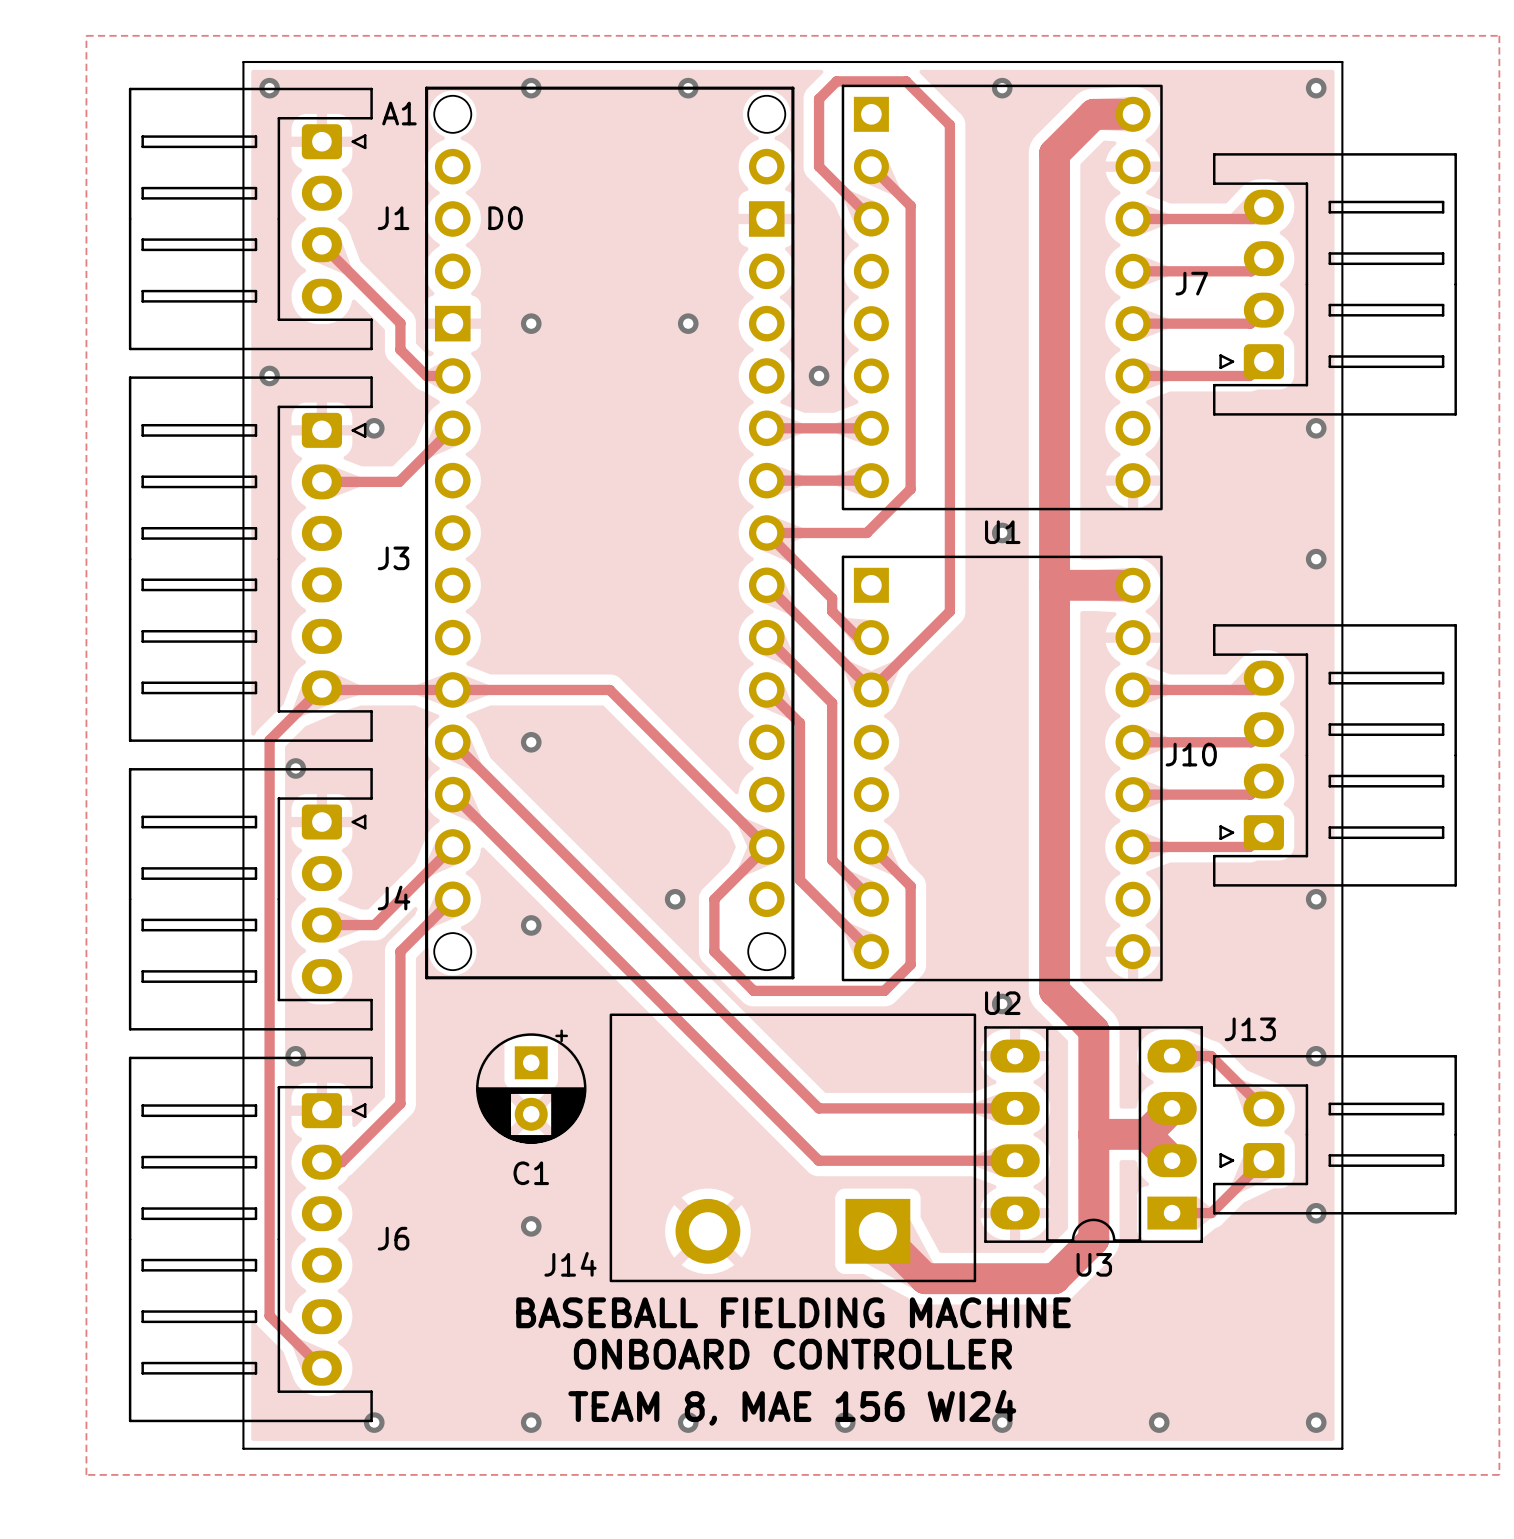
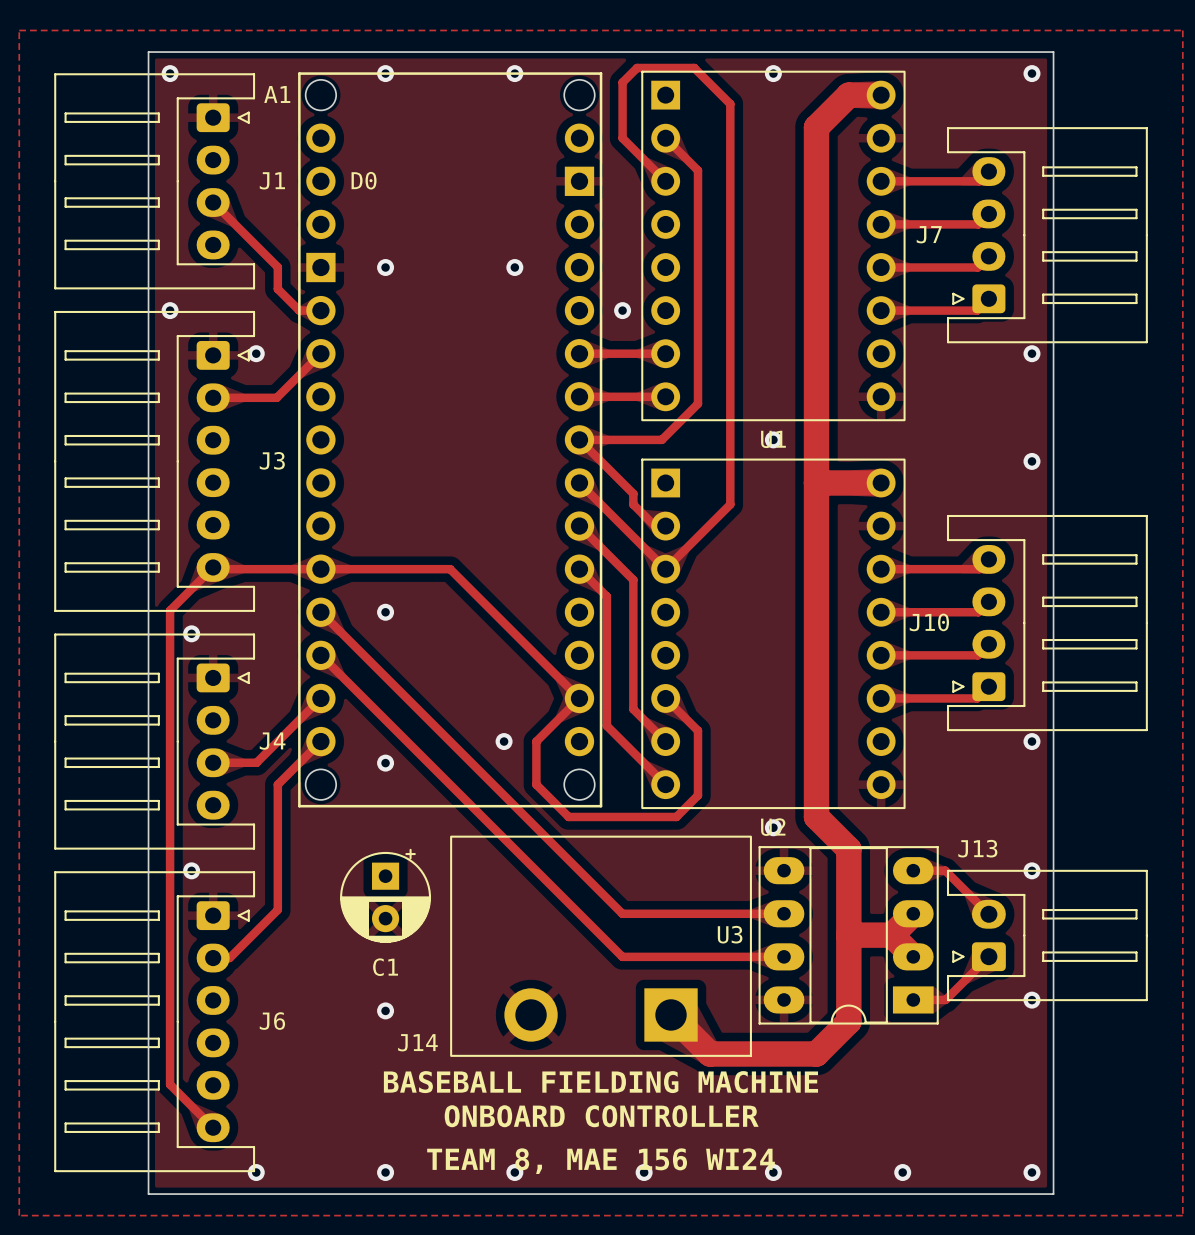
U3 name position: U3 (1094, 1264) -> U3 (730, 934)

